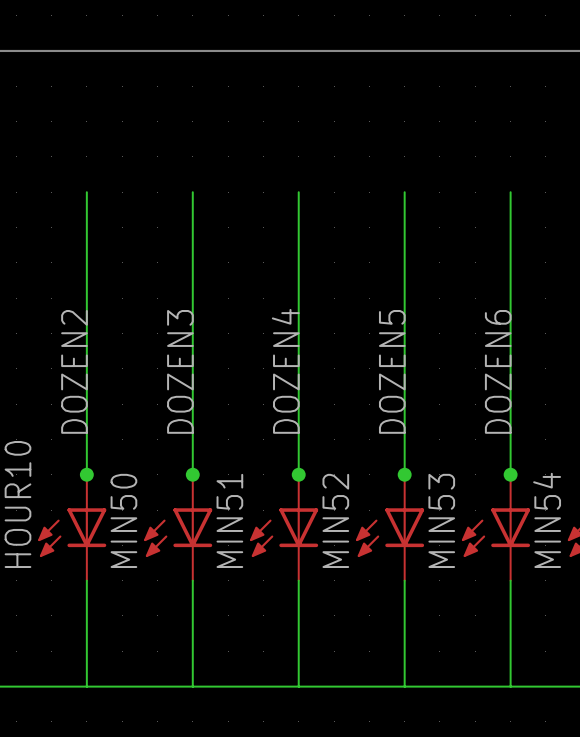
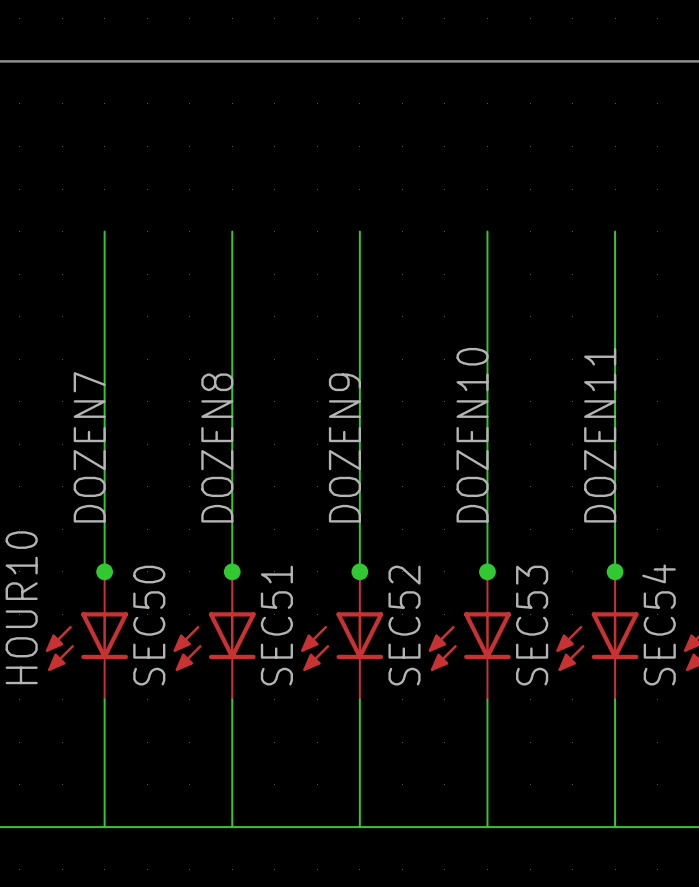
label: DOZEN2 (74, 371) -> DOZEN7 (89, 447)
label: DOZEN3 (180, 371) -> DOZEN8 (217, 447)
label: DOZEN4 (285, 371) -> DOZEN9 (344, 447)
label: DOZEN5 (392, 371) -> DOZEN10 (472, 435)
label: DOZEN6 (498, 371) -> DOZEN11 (600, 435)
MIN50 name: MIN50 (123, 520) -> SEC50 (149, 625)
MIN51 name: MIN51 (229, 520) -> SEC51 (276, 625)
MIN52 name: MIN52 (335, 520) -> SEC52 (404, 625)
MIN53 name: MIN53 (441, 520) -> SEC53 (532, 625)
MIN54 name: MIN54 (547, 520) -> SEC54 (659, 624)

